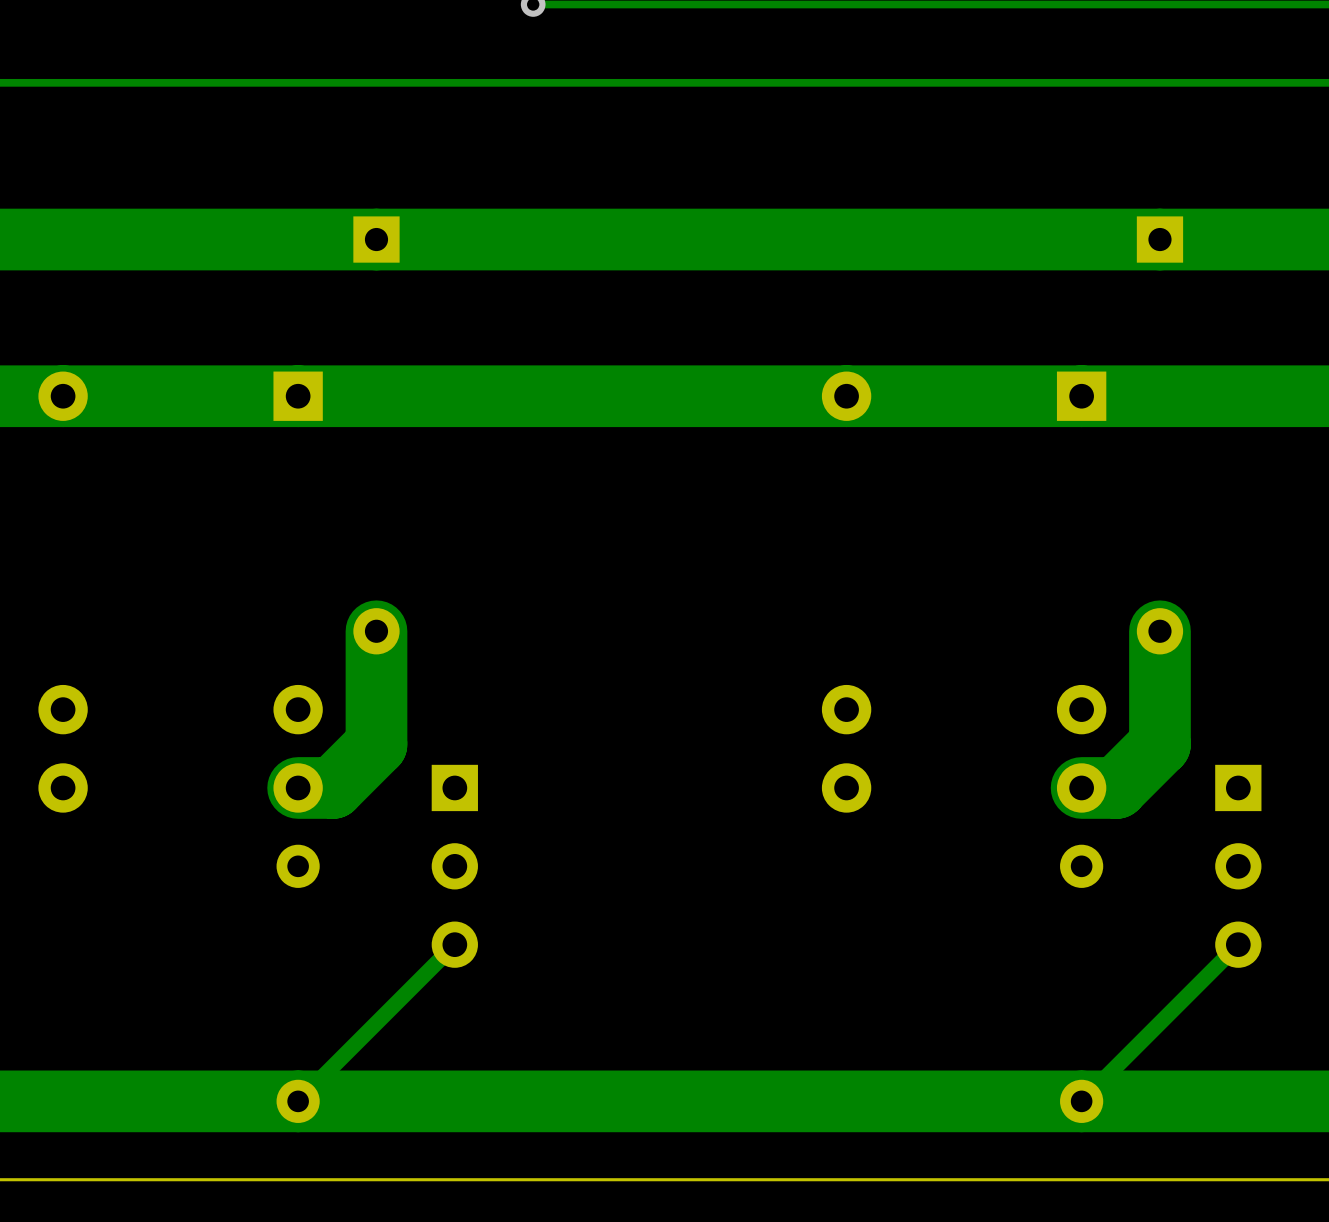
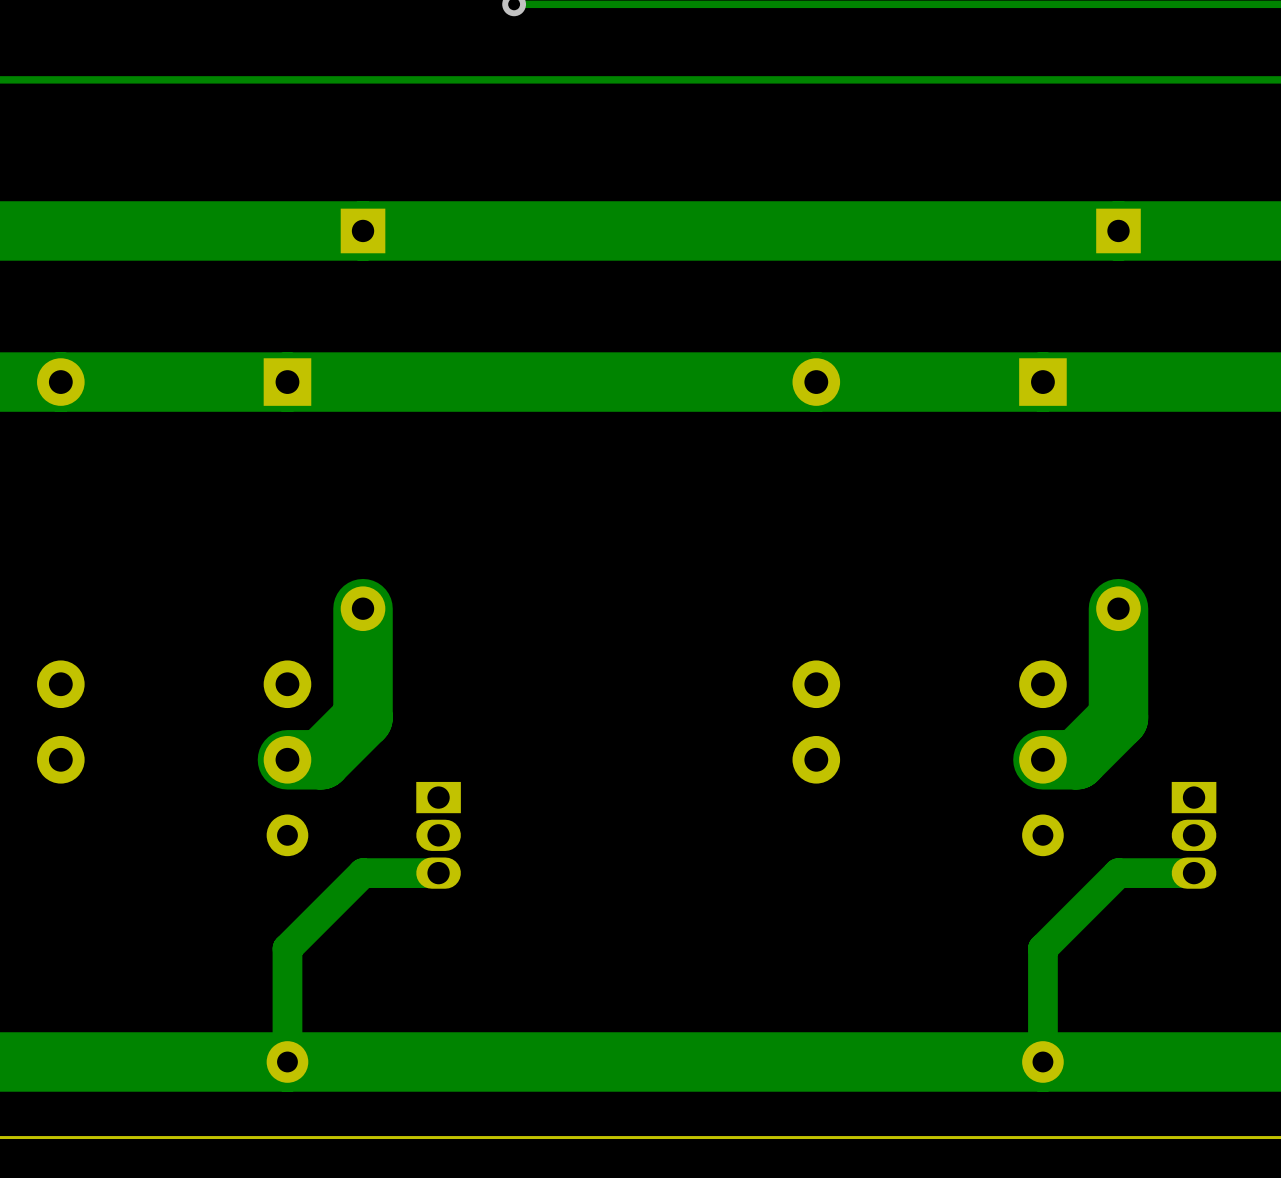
part footprint: [431, 764, 478, 968] -> [416, 781, 461, 889]
part footprint: [1215, 764, 1262, 968] -> [1171, 781, 1217, 889]
track: (454, 944) (298, 1101) -> (438, 873) (363, 873) (287, 948) (287, 1061)
track: (1238, 944) (1081, 1101) -> (1194, 873) (1118, 873) (1042, 948) (1042, 1061)

